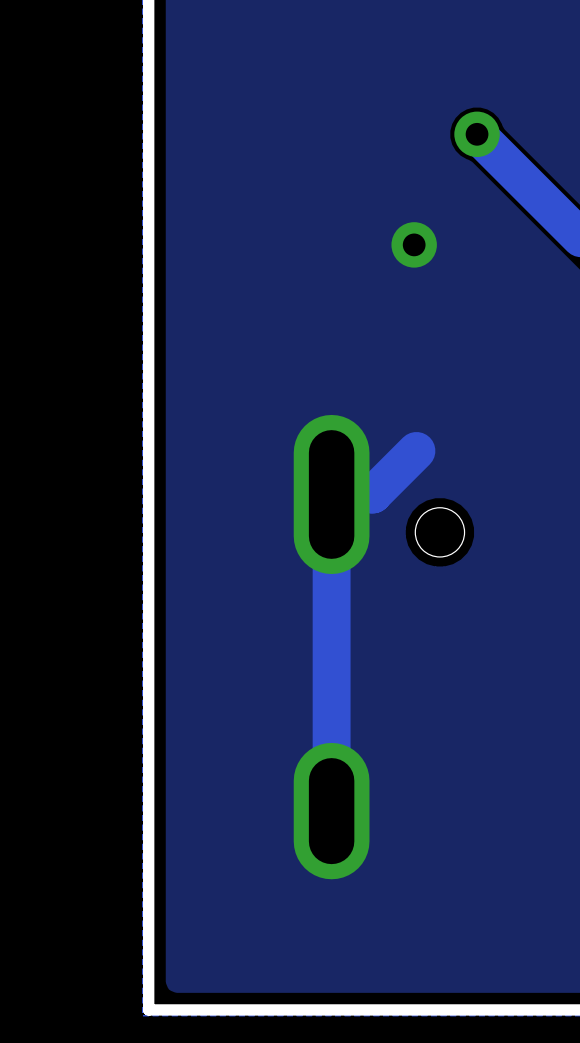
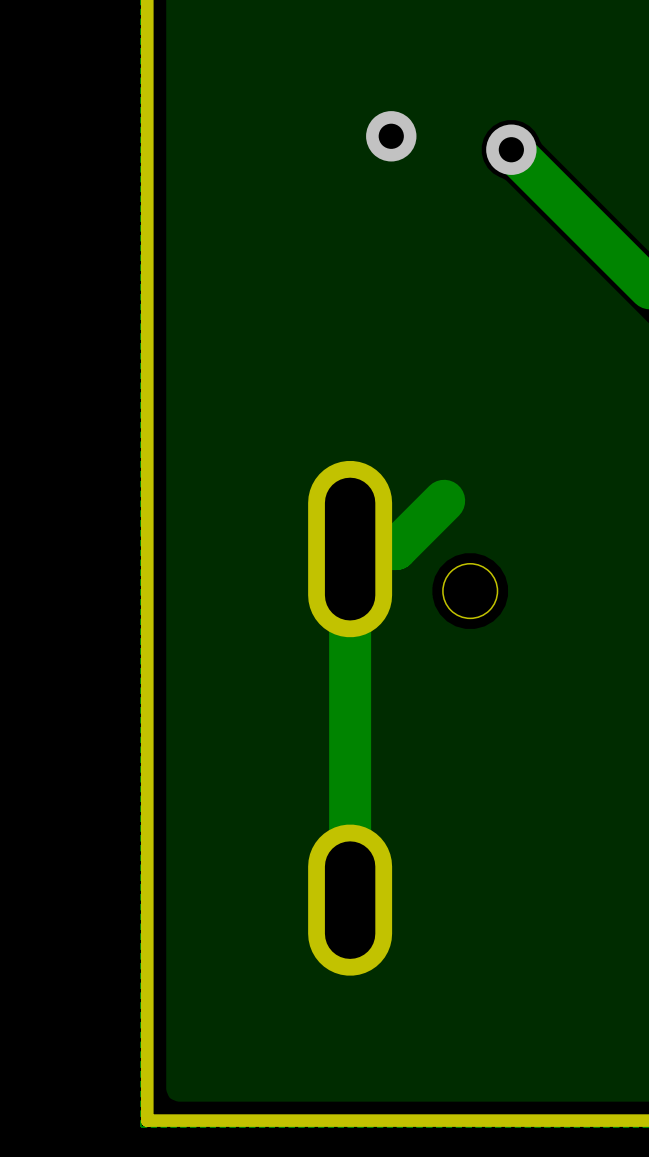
via position: (414, 244) -> (391, 136)

